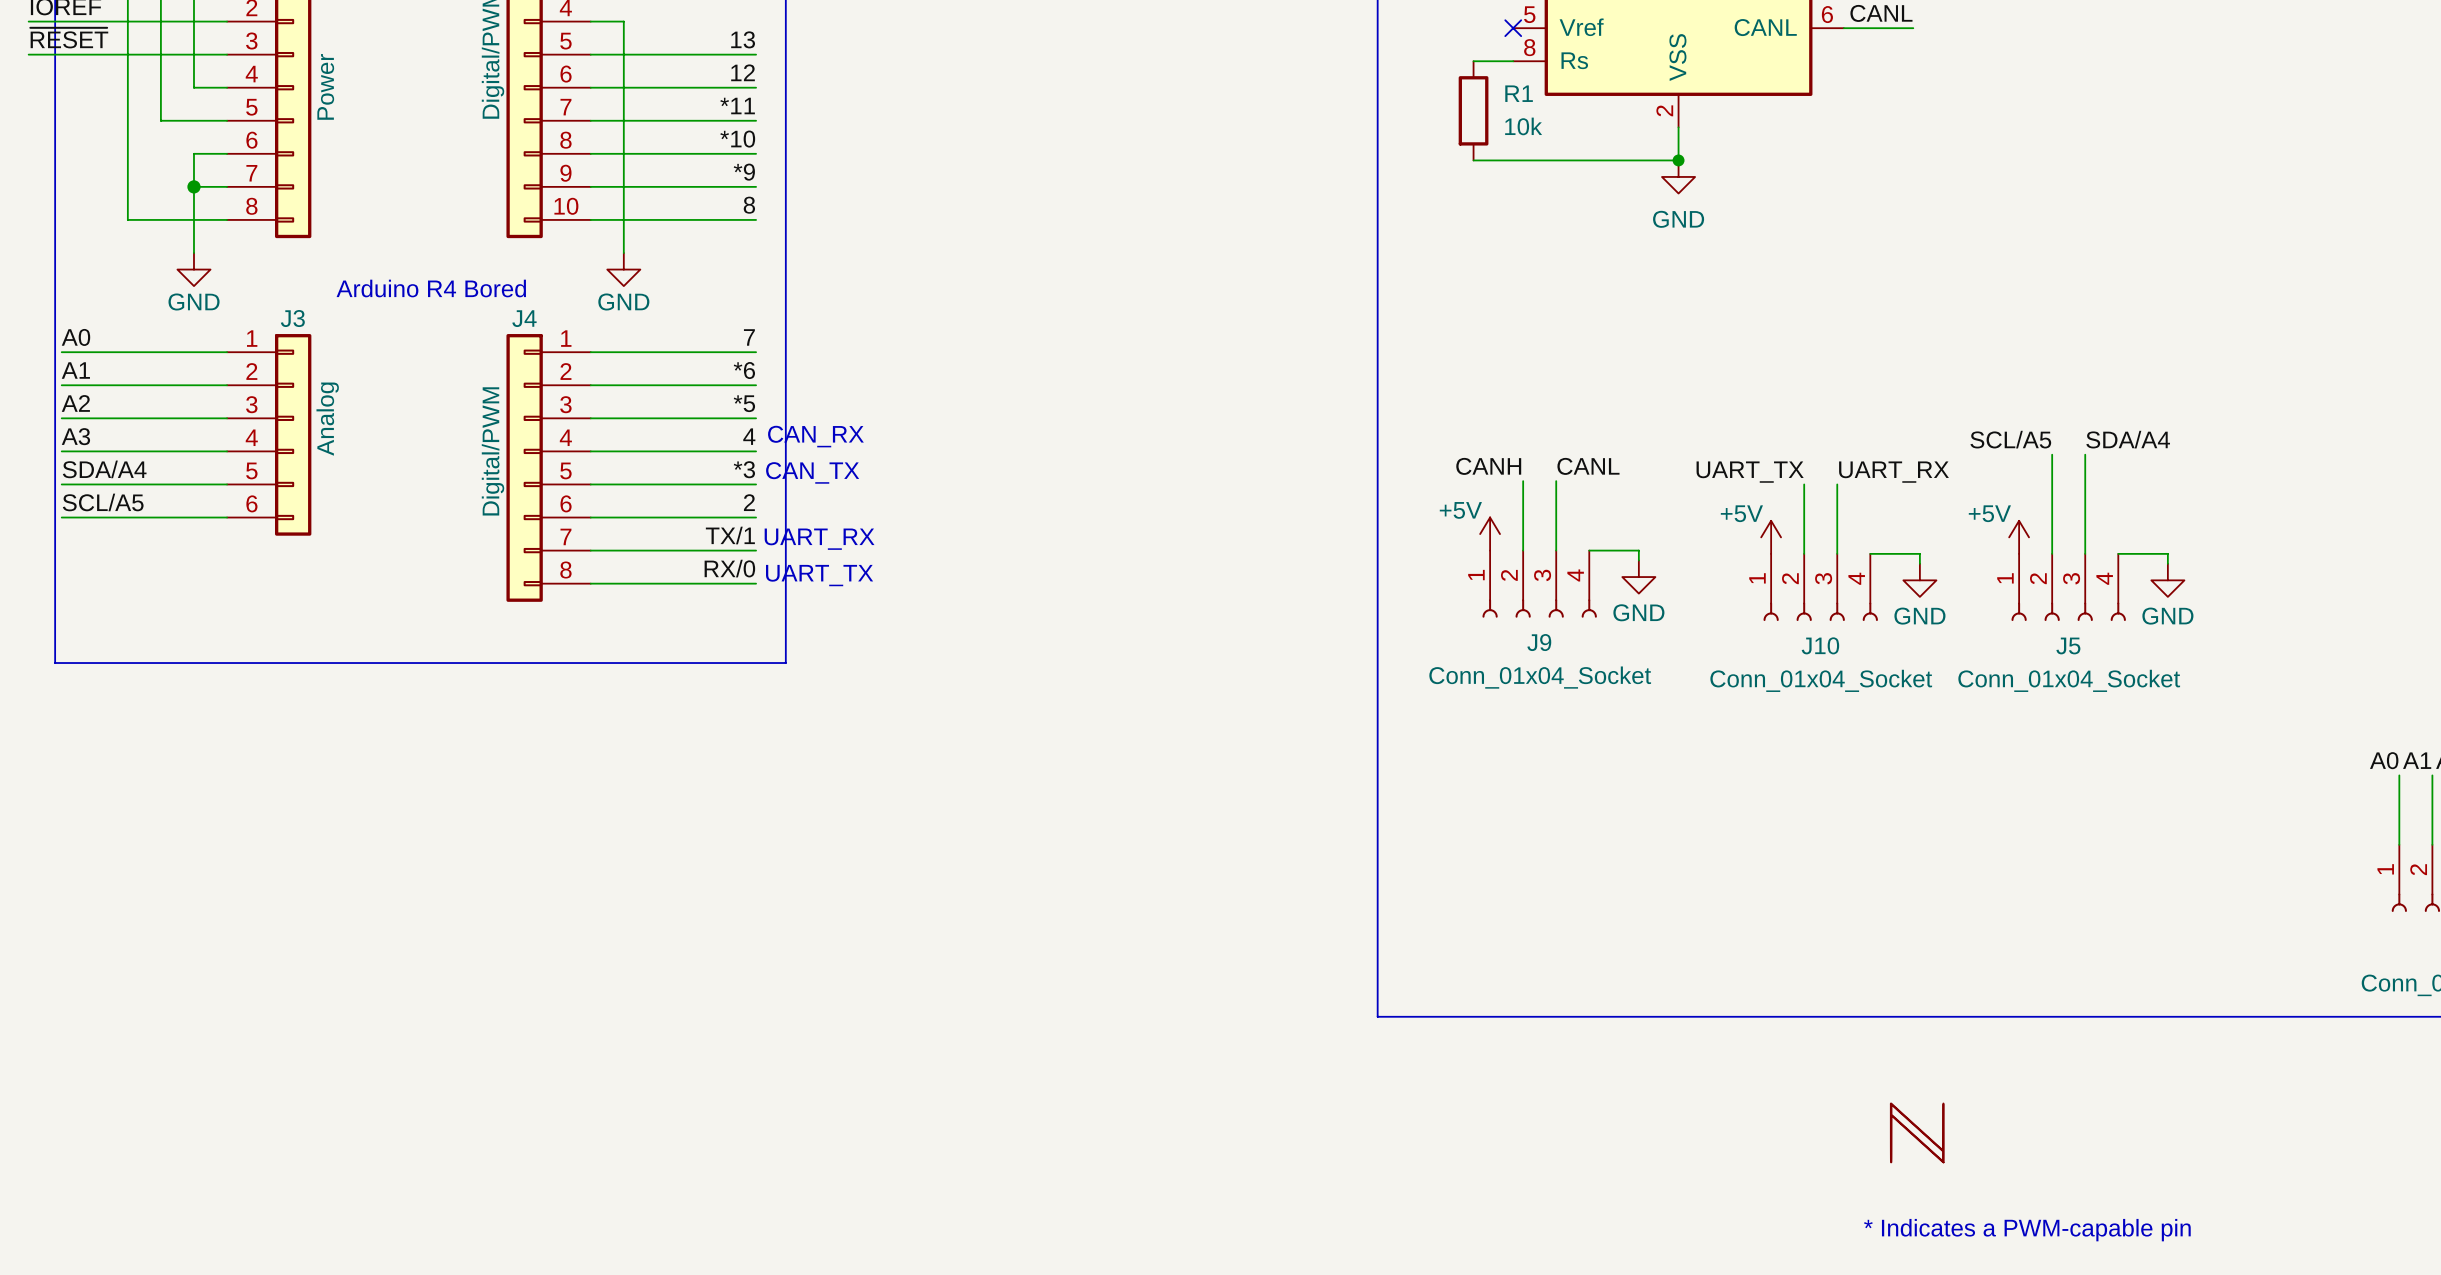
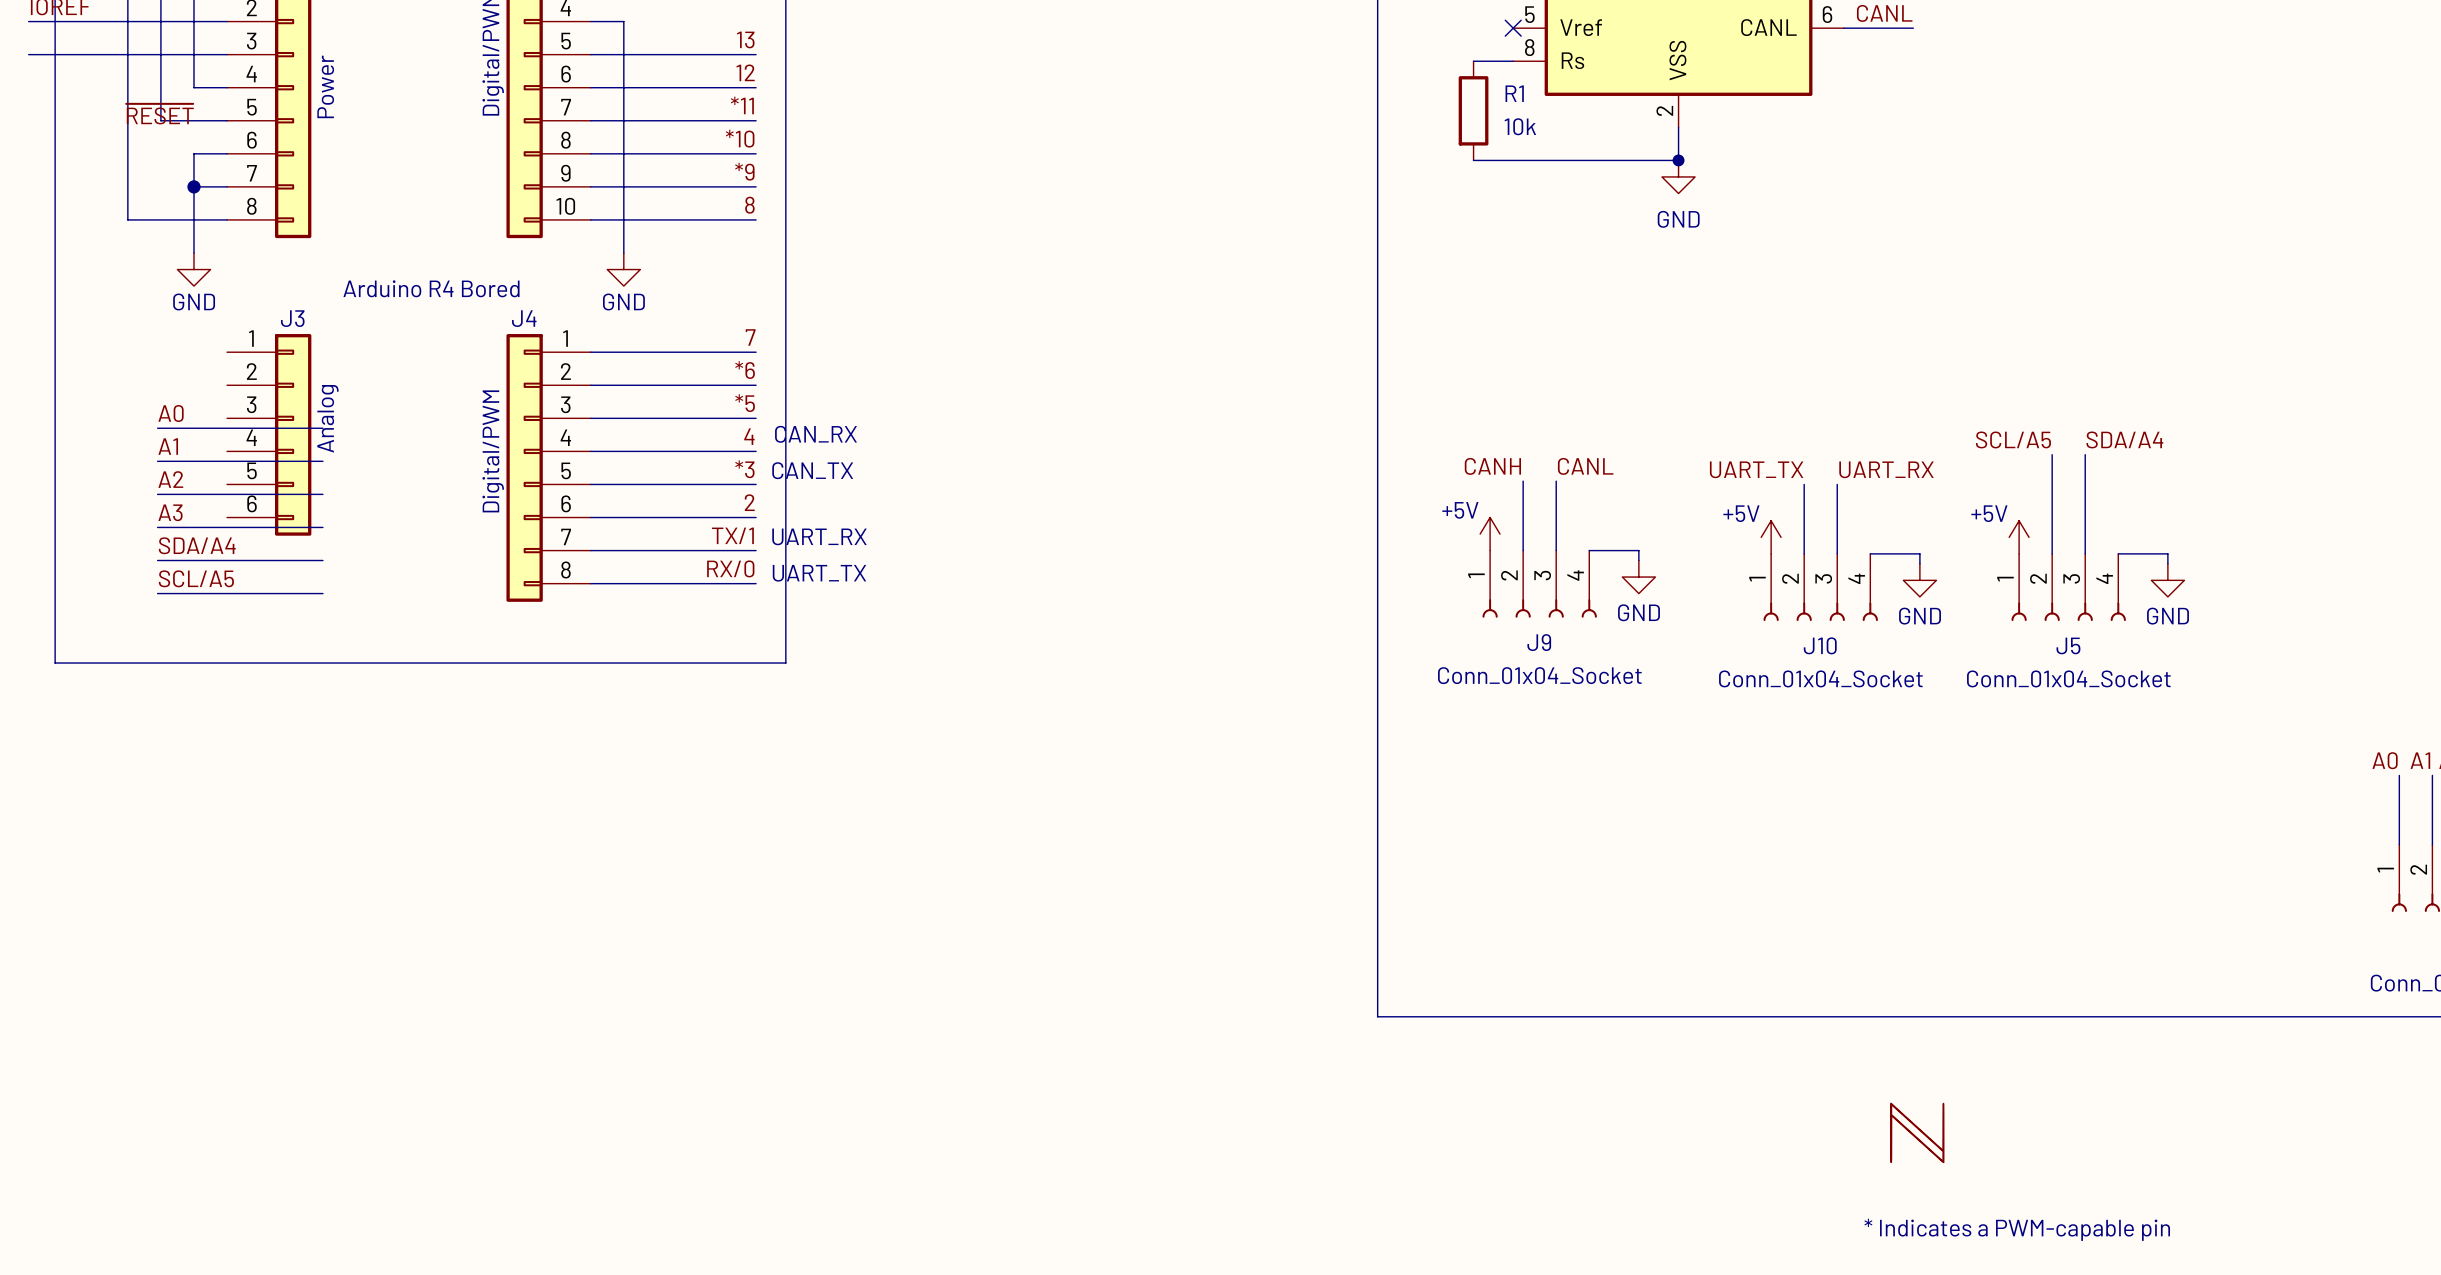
label position: ~{RESET} (69, 38) -> ~{RESET} (160, 114)
label position: A0 (75, 337) -> A0 (171, 413)
wire: (61, 352) (227, 352) -> (157, 428) (322, 428)
label position: A1 (75, 370) -> A1 (168, 446)
wire: (61, 385) (227, 385) -> (157, 461) (322, 461)
label position: A2 (75, 403) -> A2 (170, 479)
wire: (61, 418) (227, 418) -> (157, 494) (322, 494)
label position: A3 (75, 436) -> A3 (170, 512)
wire: (61, 451) (227, 451) -> (157, 527) (322, 527)
label position: SDA/A4 (104, 469) -> SDA/A4 (197, 545)
wire: (61, 484) (227, 484) -> (157, 560) (322, 560)
label position: SCL/A5 (103, 502) -> SCL/A5 (196, 578)
wire: (61, 517) (227, 517) -> (157, 593) (322, 593)

